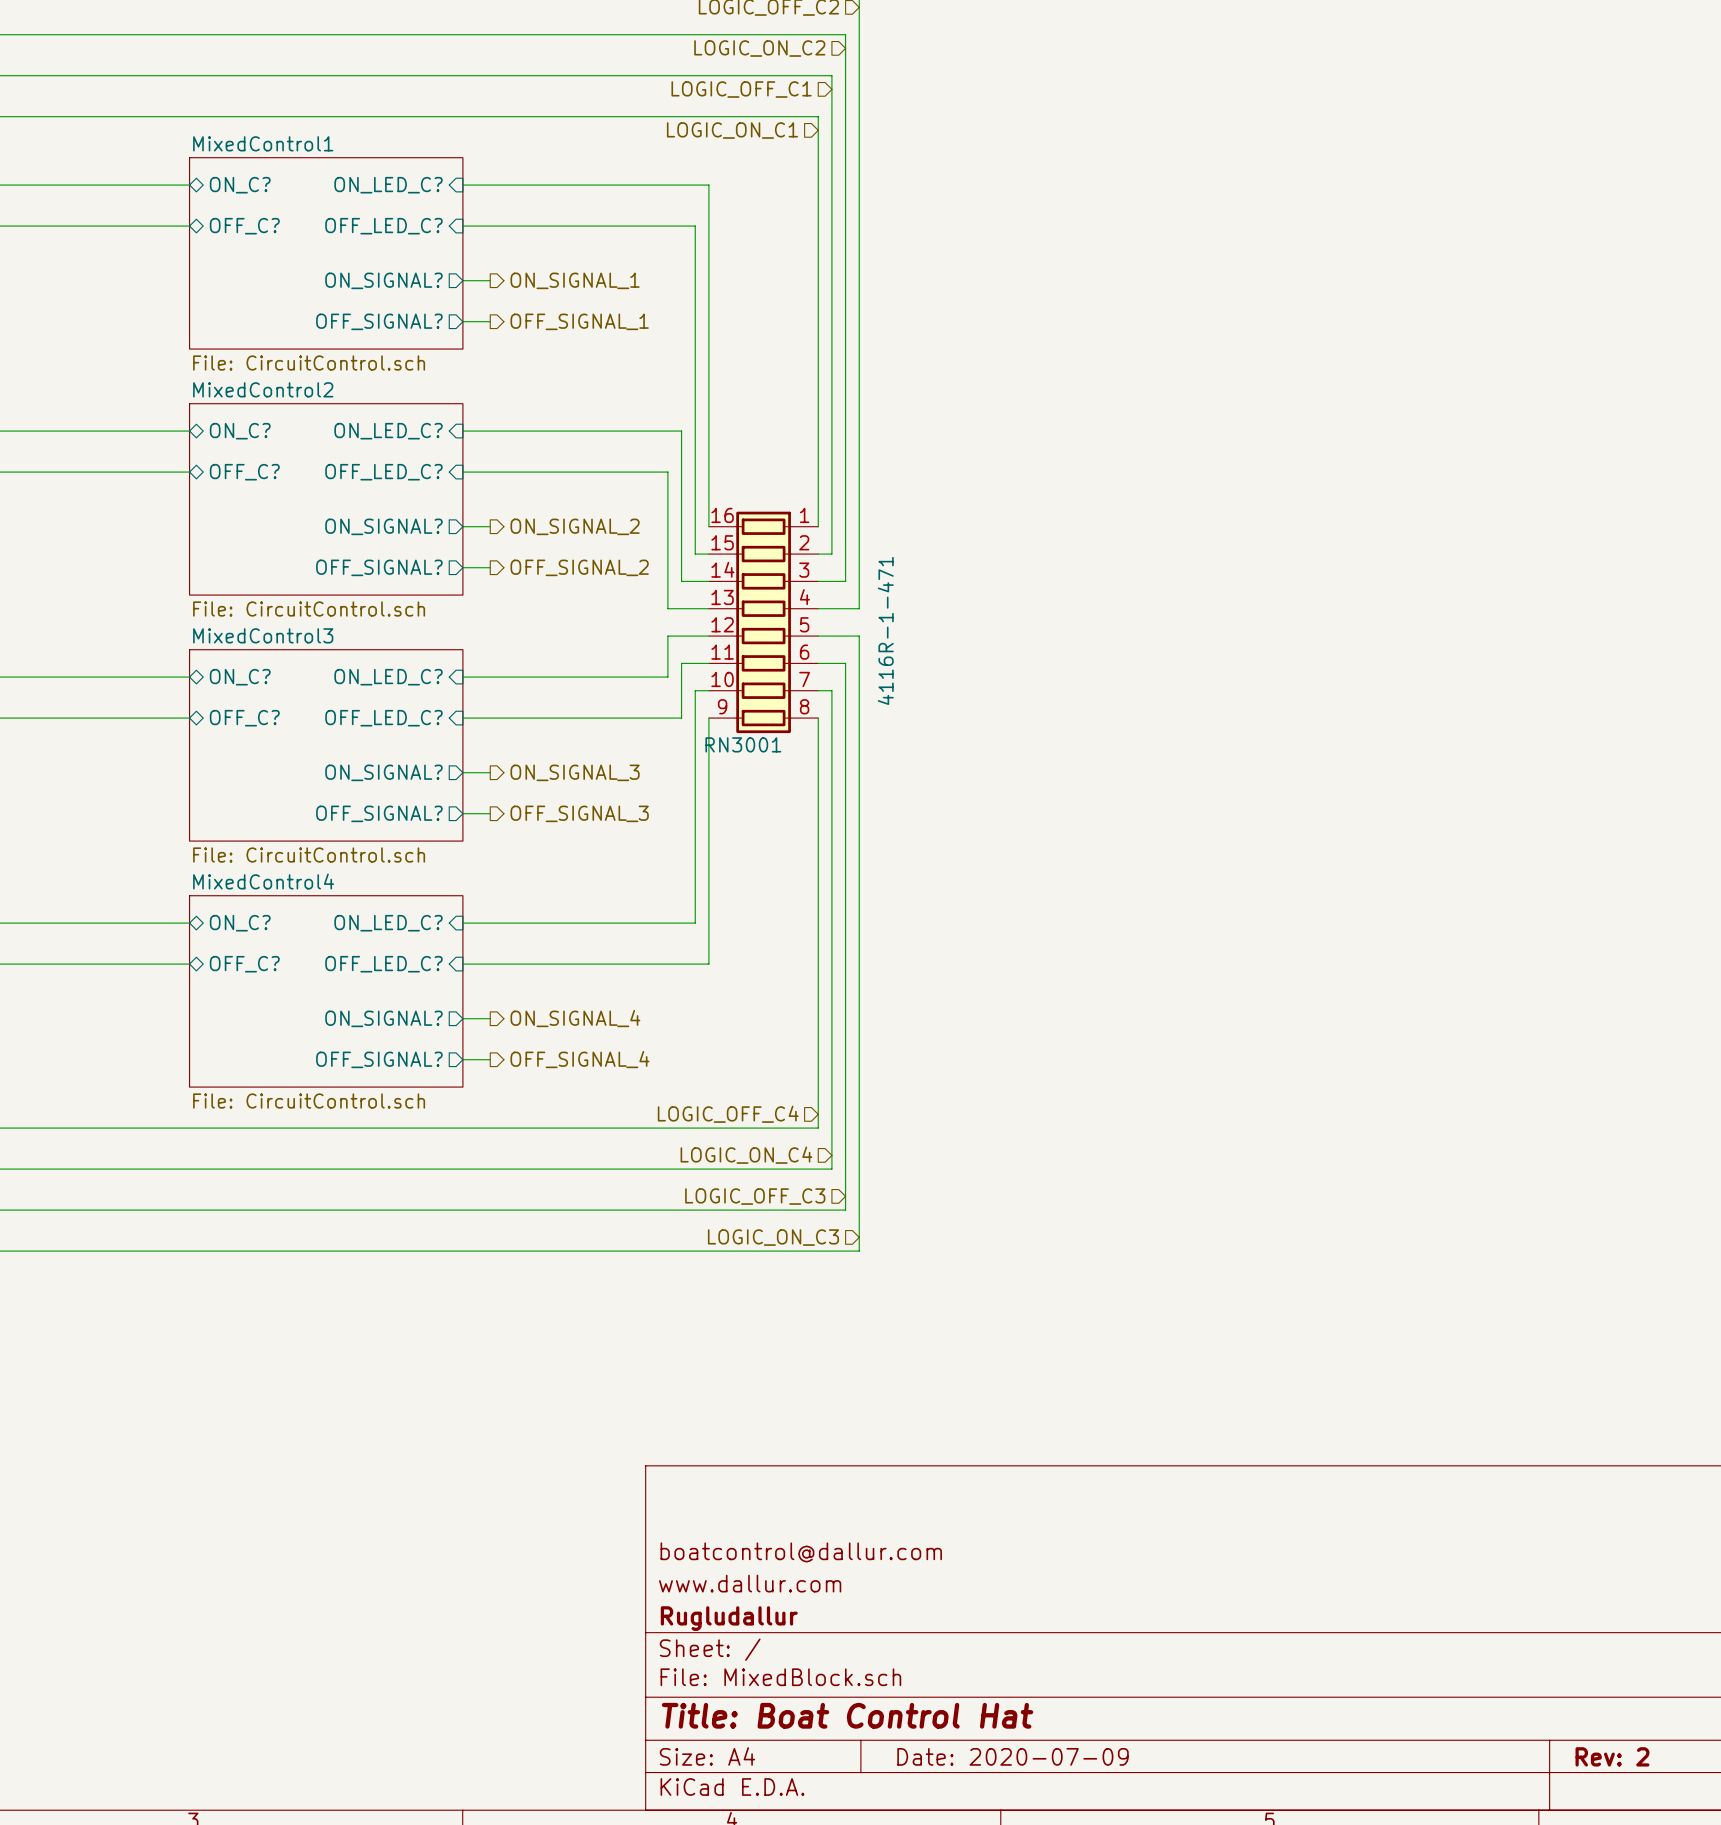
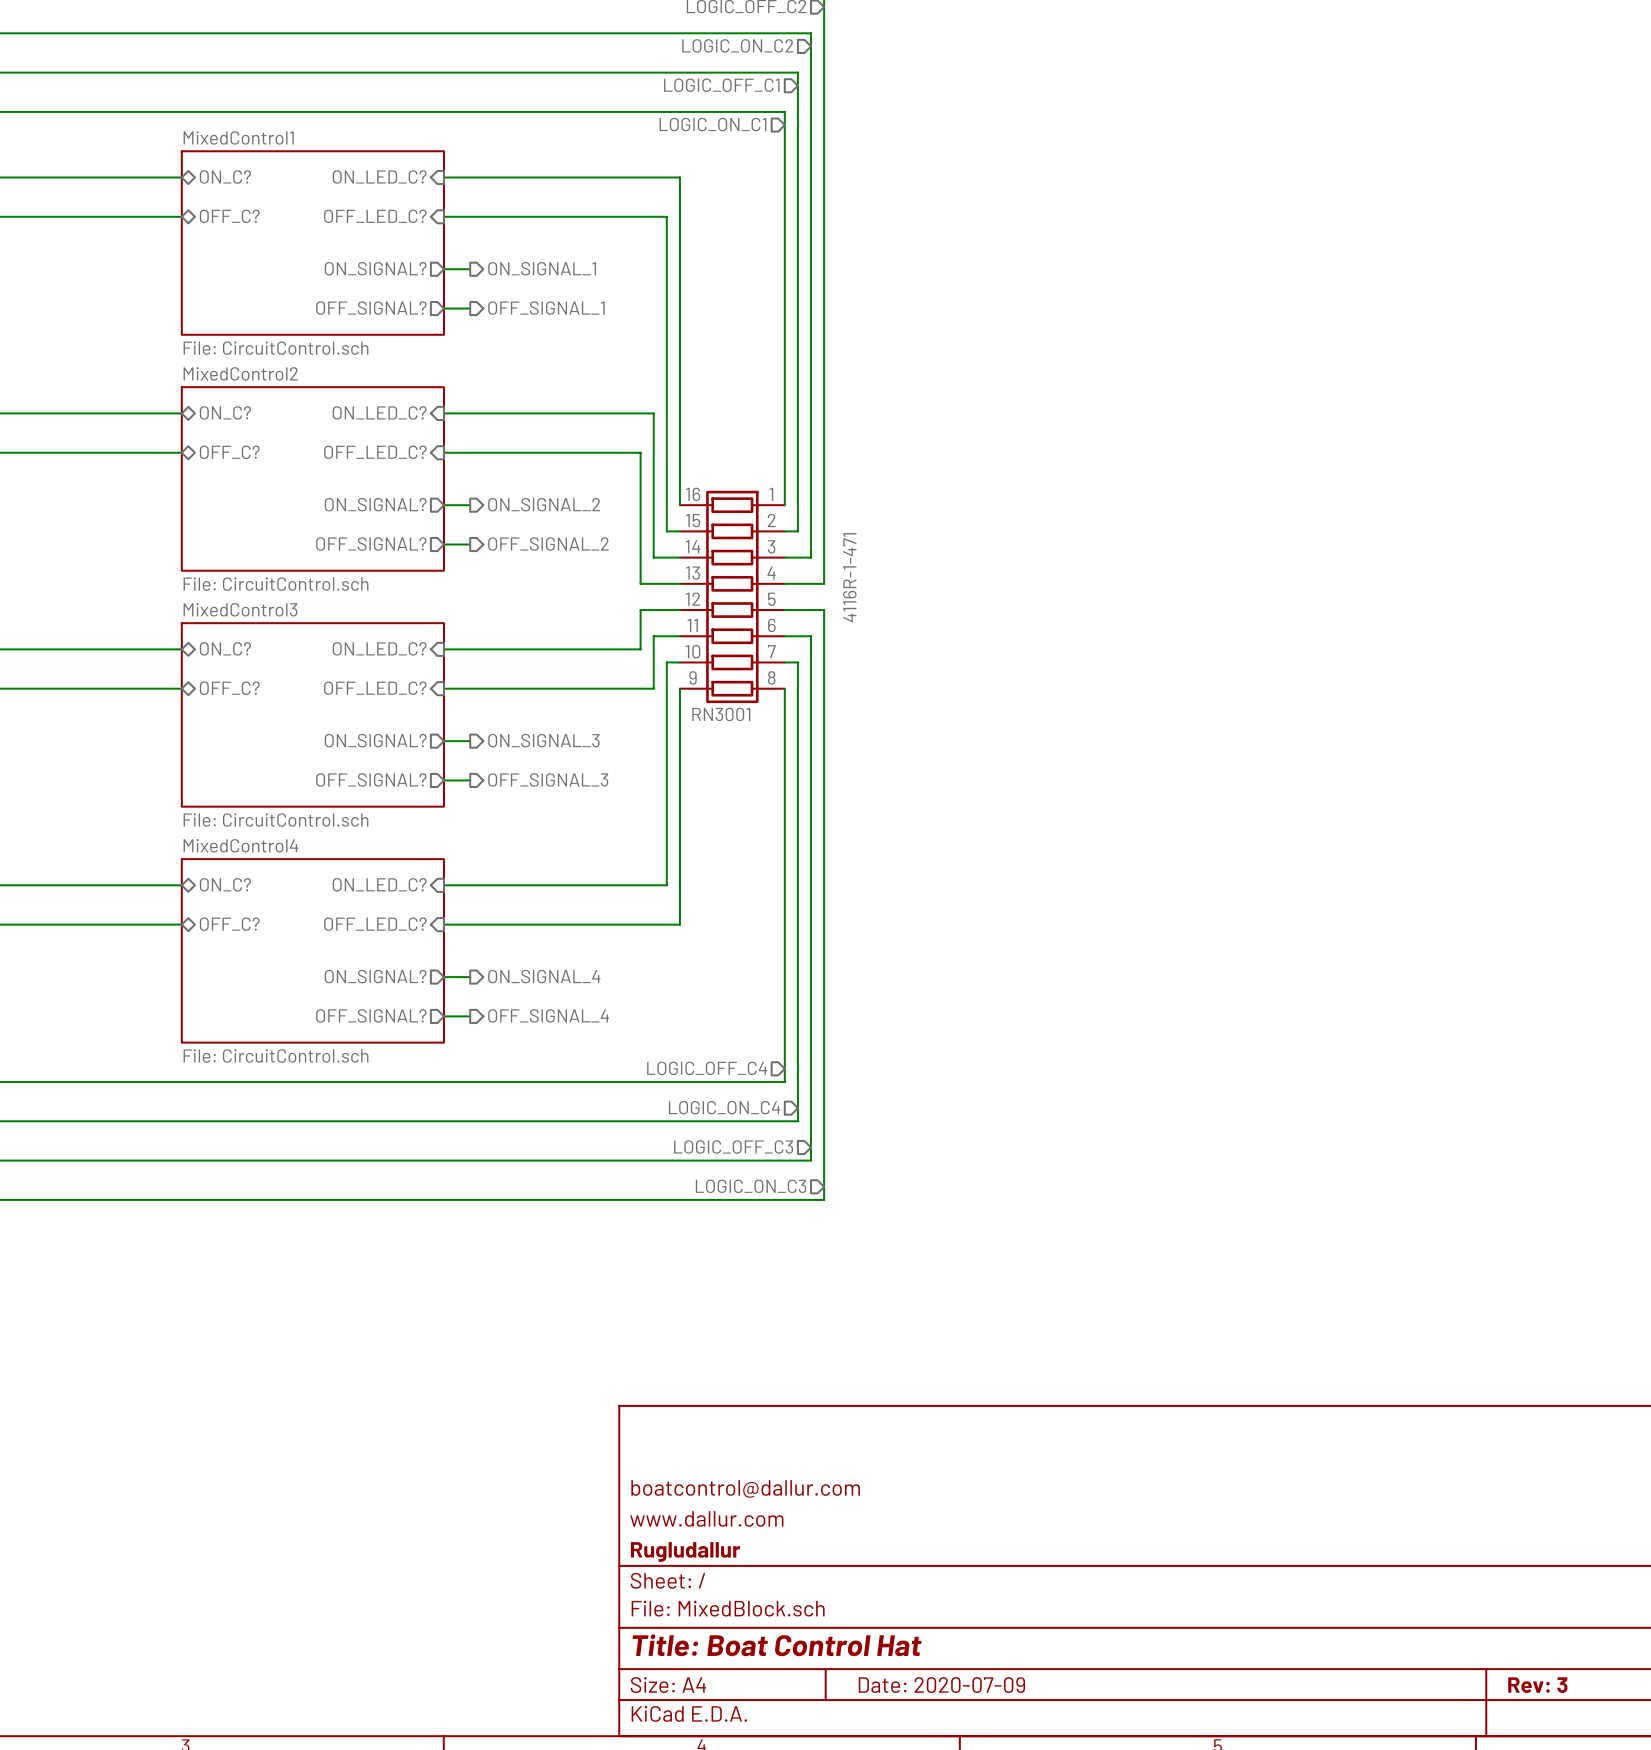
title block: Rev: 2 (1612, 1756) -> Rev: 3 (1537, 1685)

